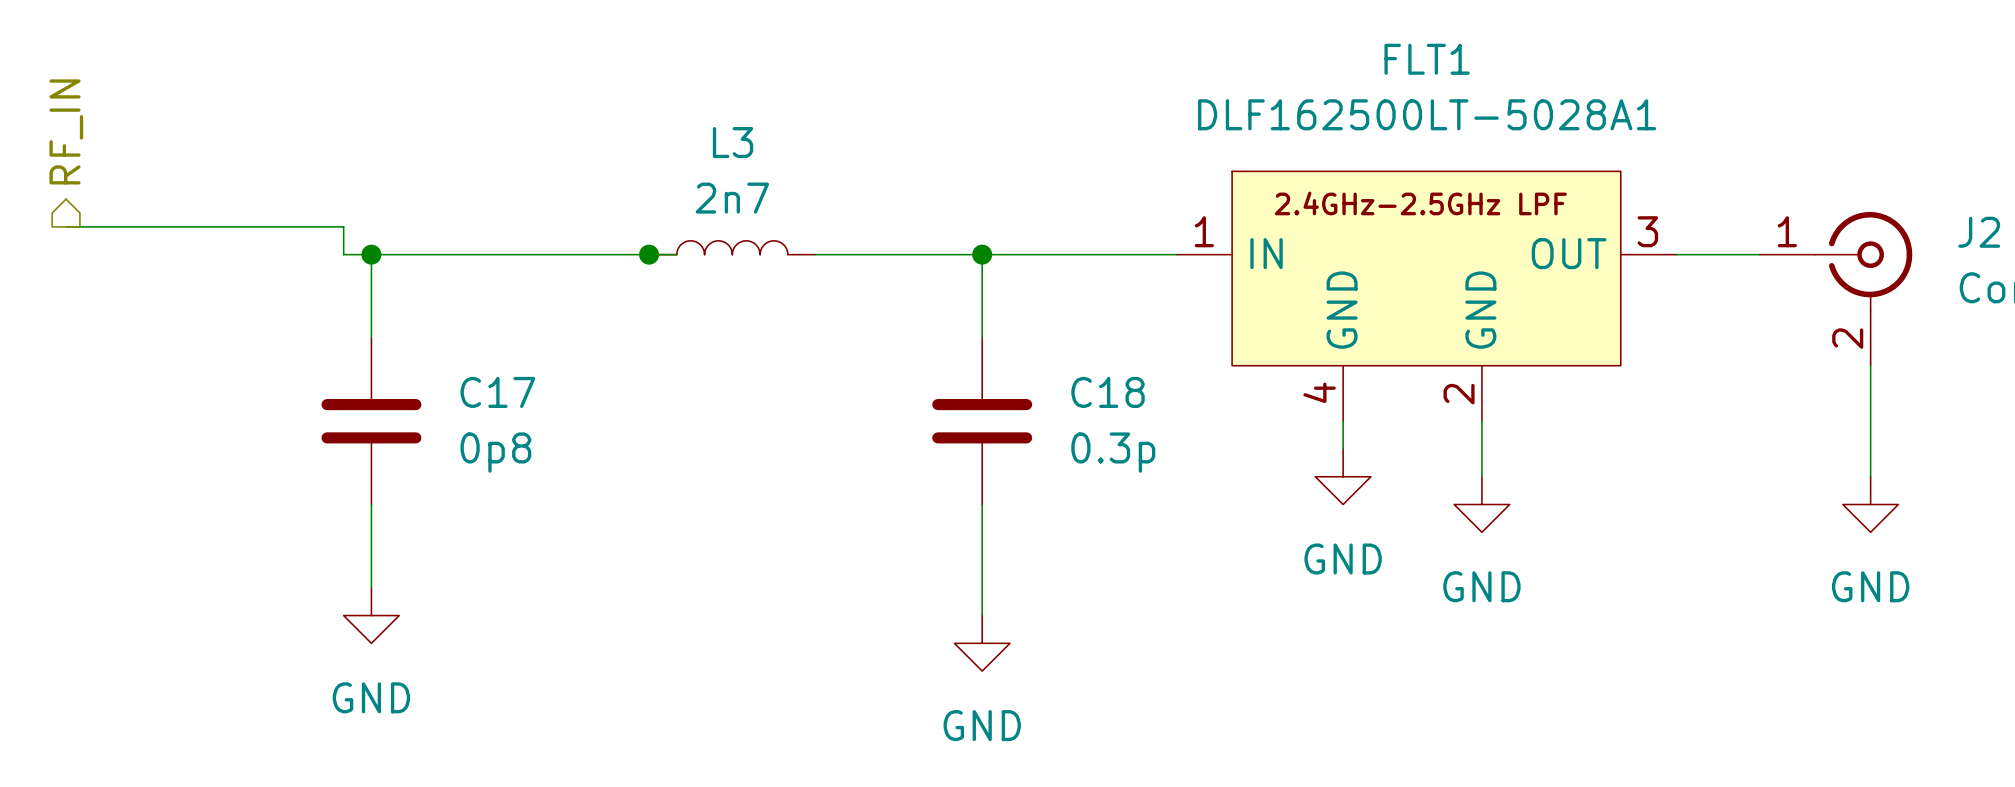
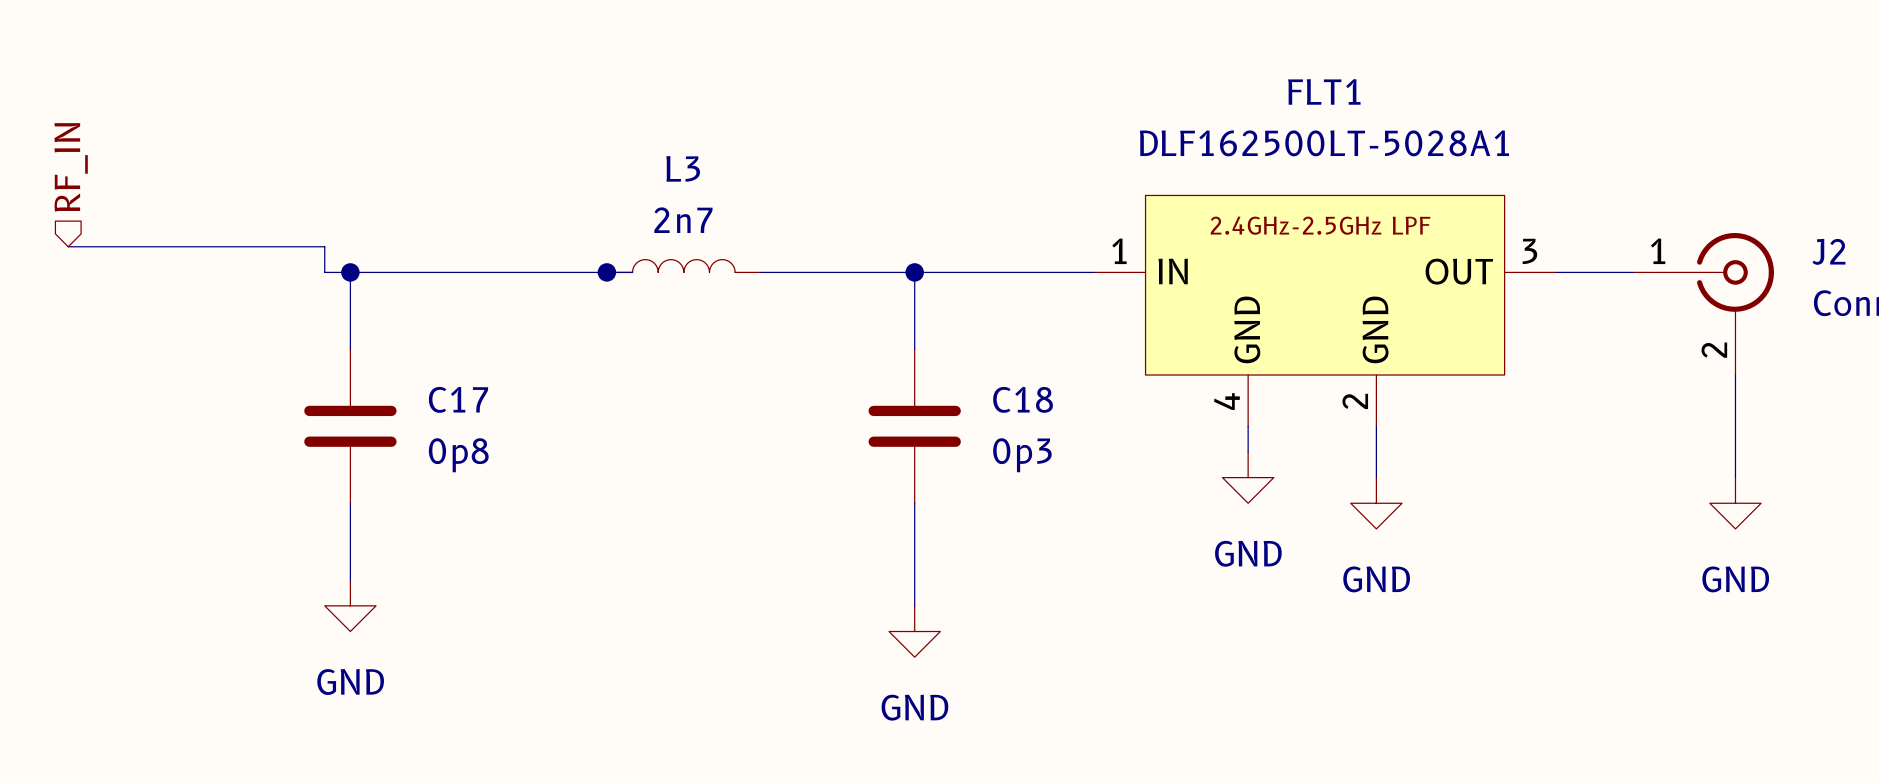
hierarchical label shape: output (66, 131) -> input (71, 167)
C18 value: 0.3p (1113, 452) -> 0p3 (1022, 455)

